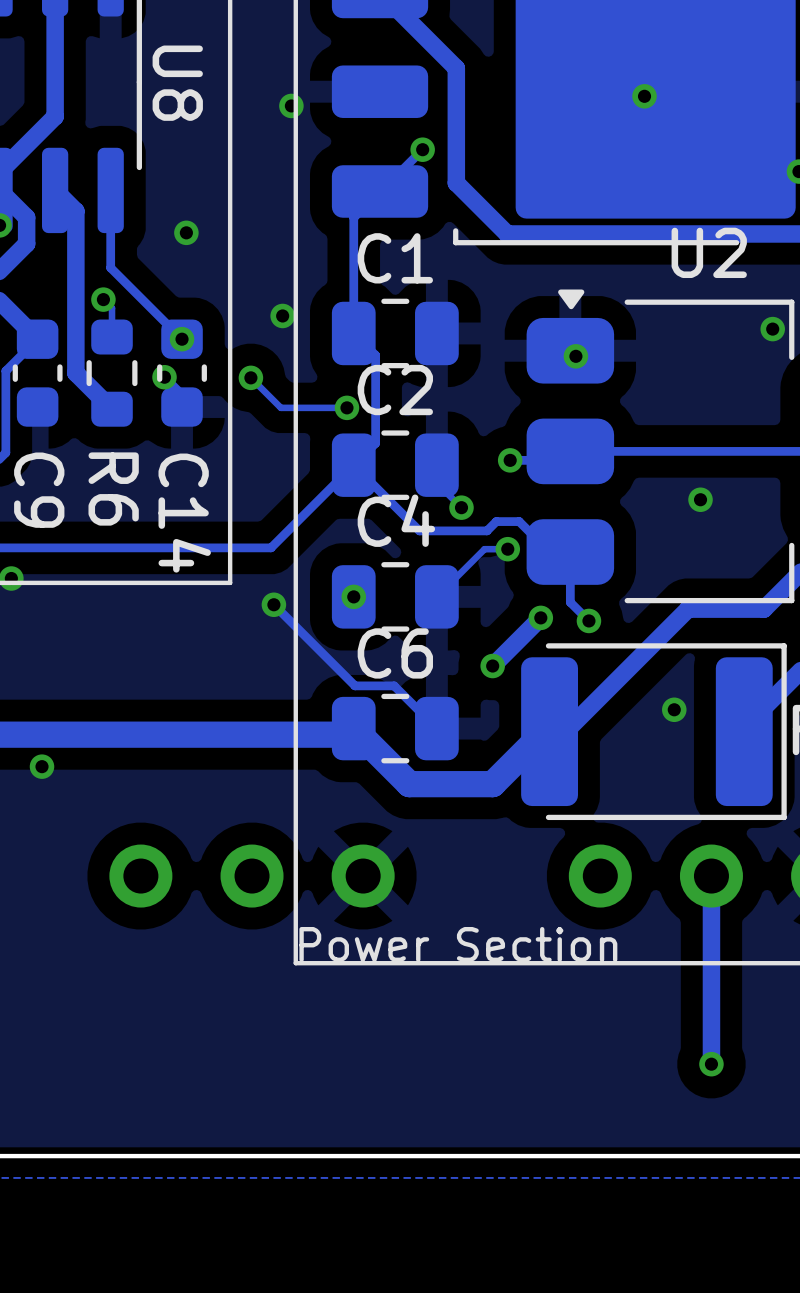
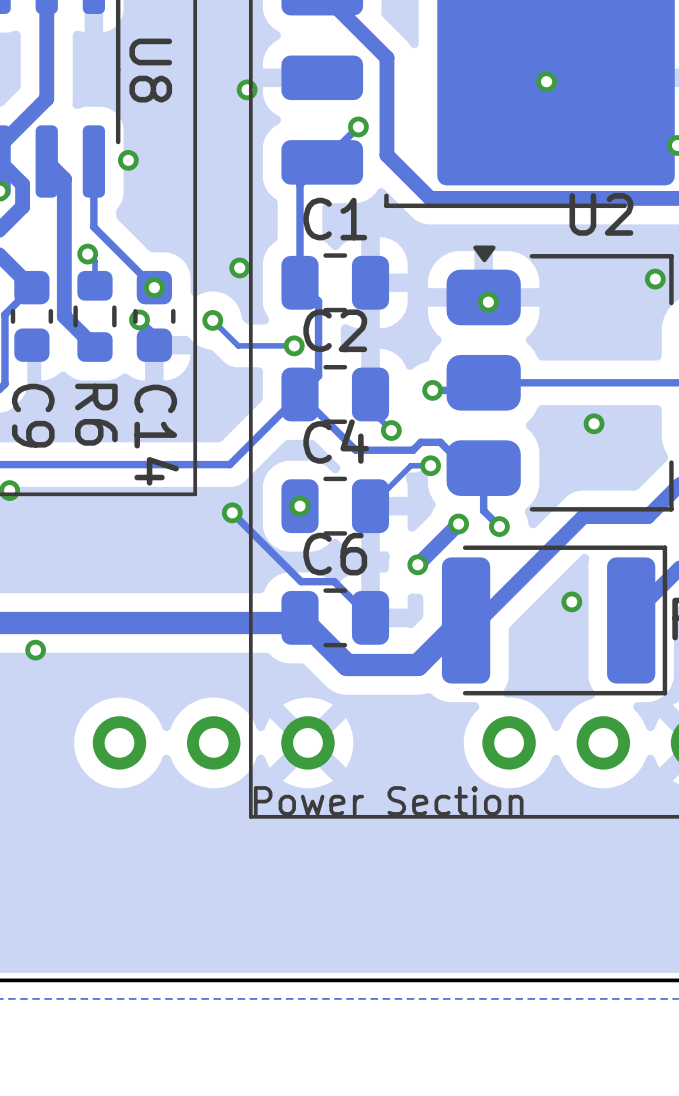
via position: (186, 232) -> (128, 160)
track: (711, 876) (711, 1064) -> none
via: (711, 1064) -> none

